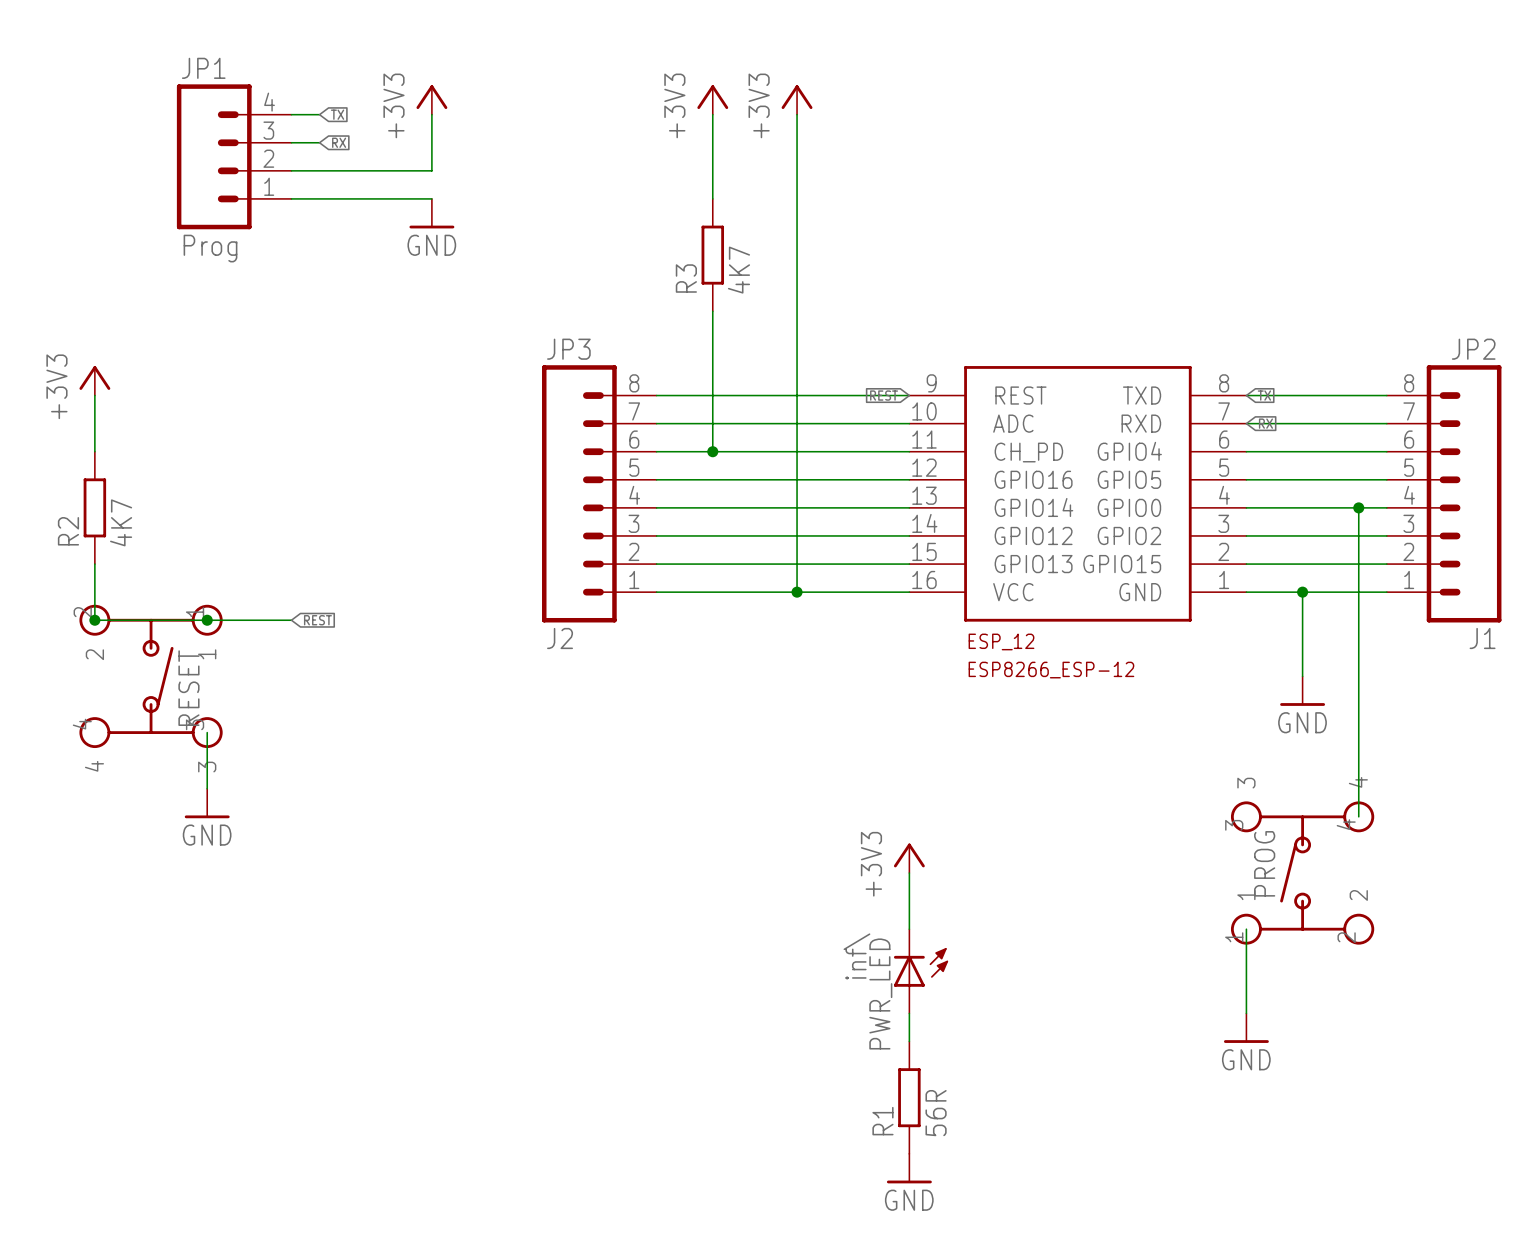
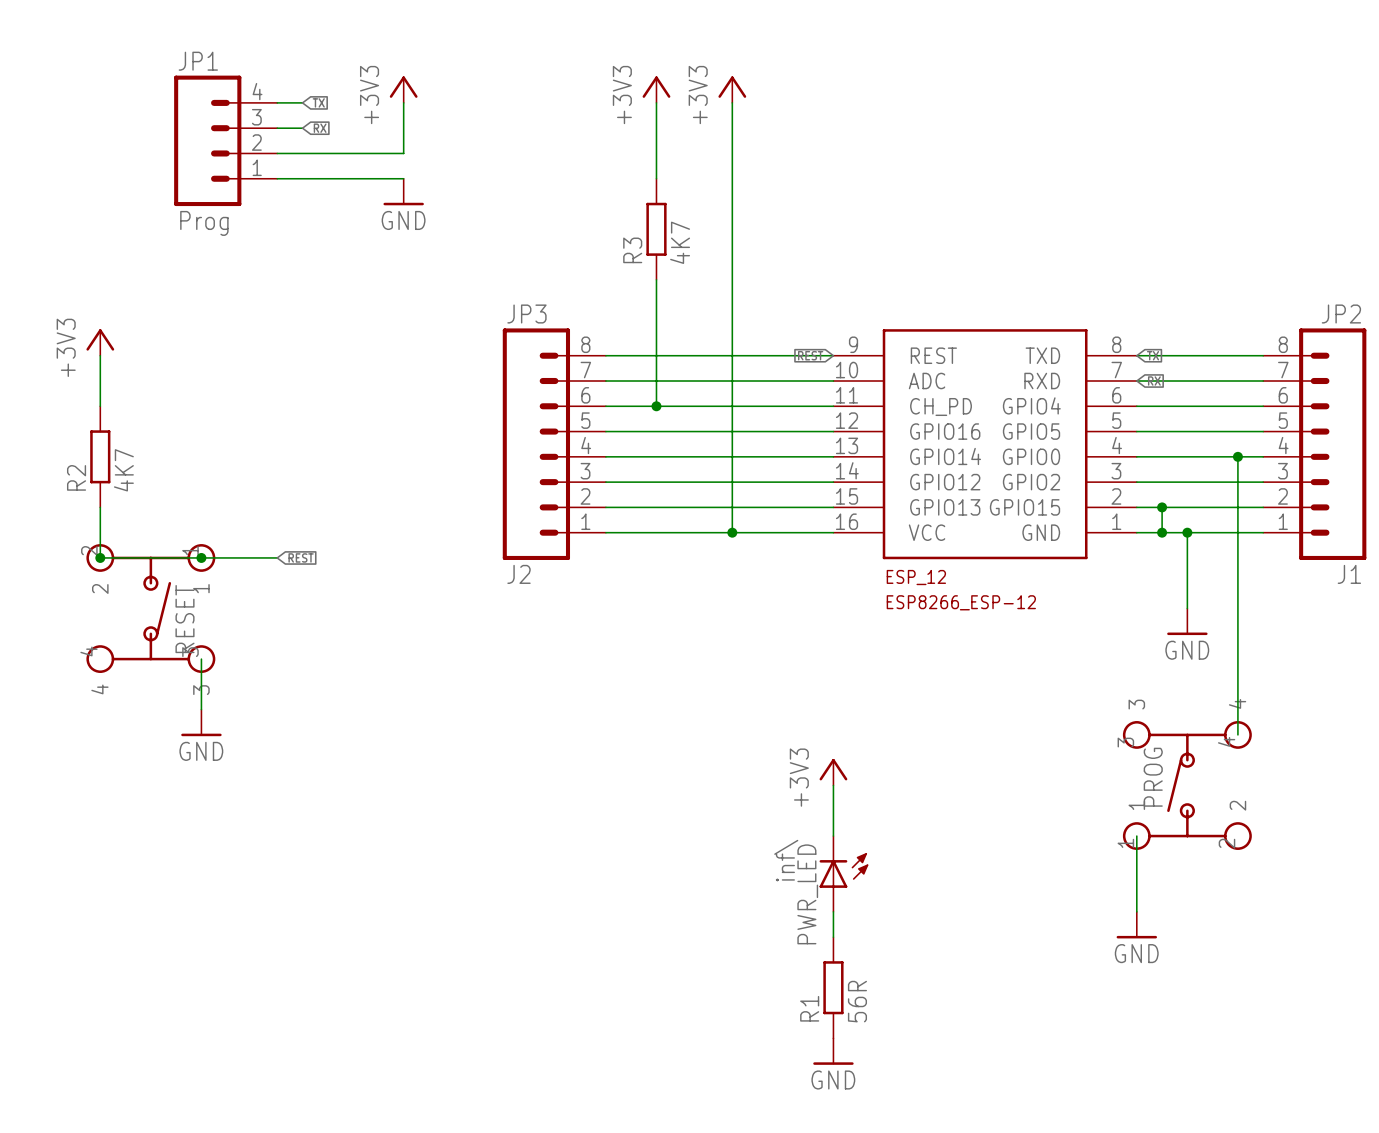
wire: none -> (1162, 507) (1162, 532)
junction: none -> (1162, 507)
junction: none -> (1162, 532)

